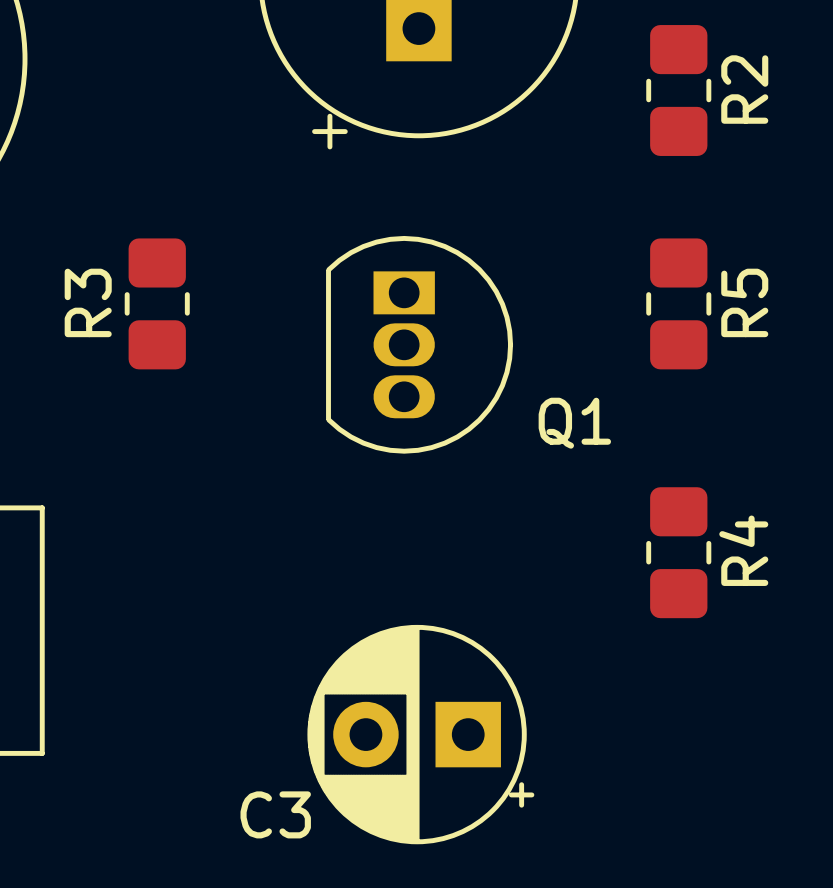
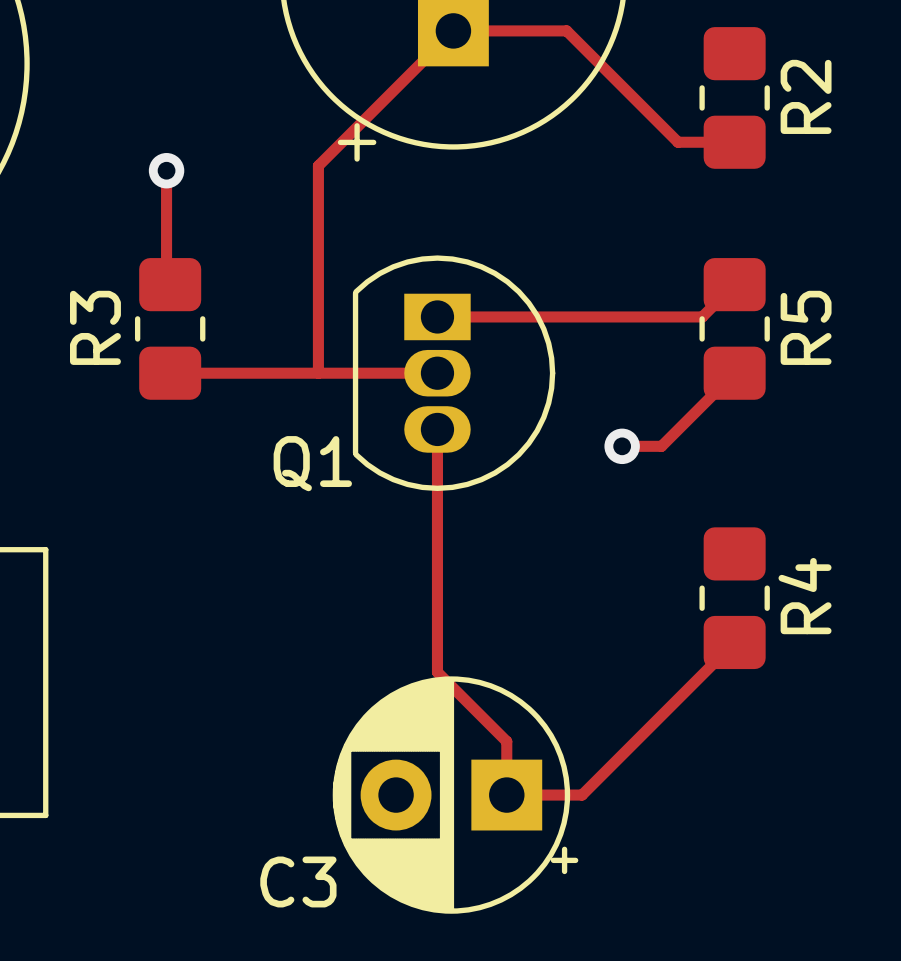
track: none -> (734, 142) (678, 142) (566, 30) (453, 30) (318, 165) (318, 373)
track: none -> (166, 170) (166, 281) (170, 284)
via: none -> (166, 170)
track: none -> (734, 284) (702, 316) (437, 316)
track: none -> (170, 373) (437, 373)
track: none -> (734, 373) (661, 446) (622, 446)
track: none -> (437, 429) (437, 672) (506, 741) (506, 795) (582, 795) (734, 642)
via: none -> (622, 446)
Q1 name position: Q1 (574, 423) -> Q1 (312, 463)

